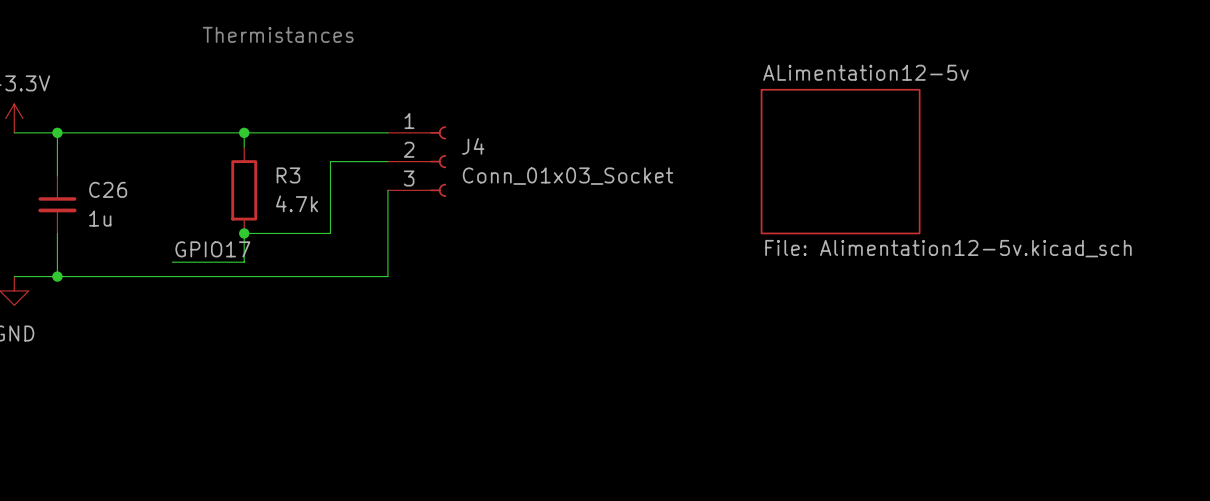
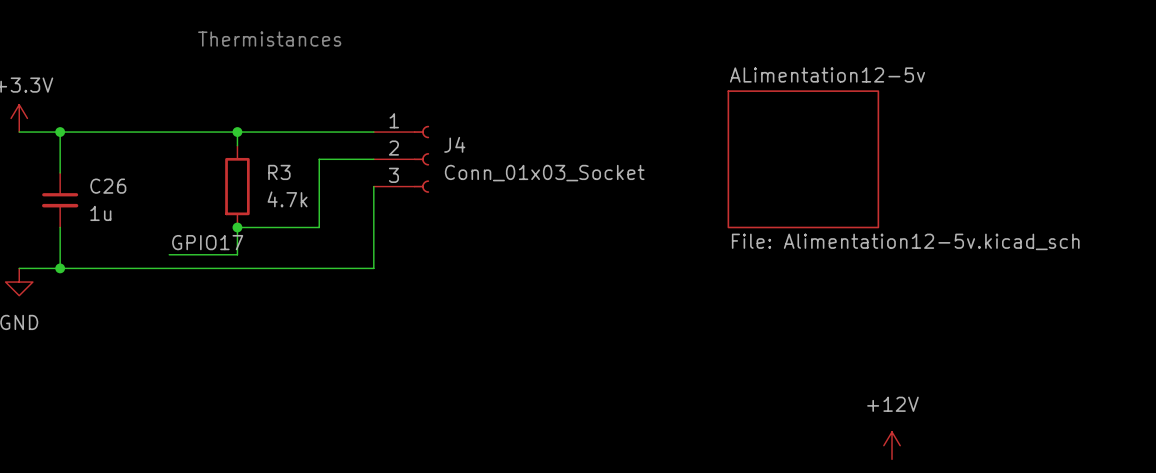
power symbol: none -> +12V (892, 445)

